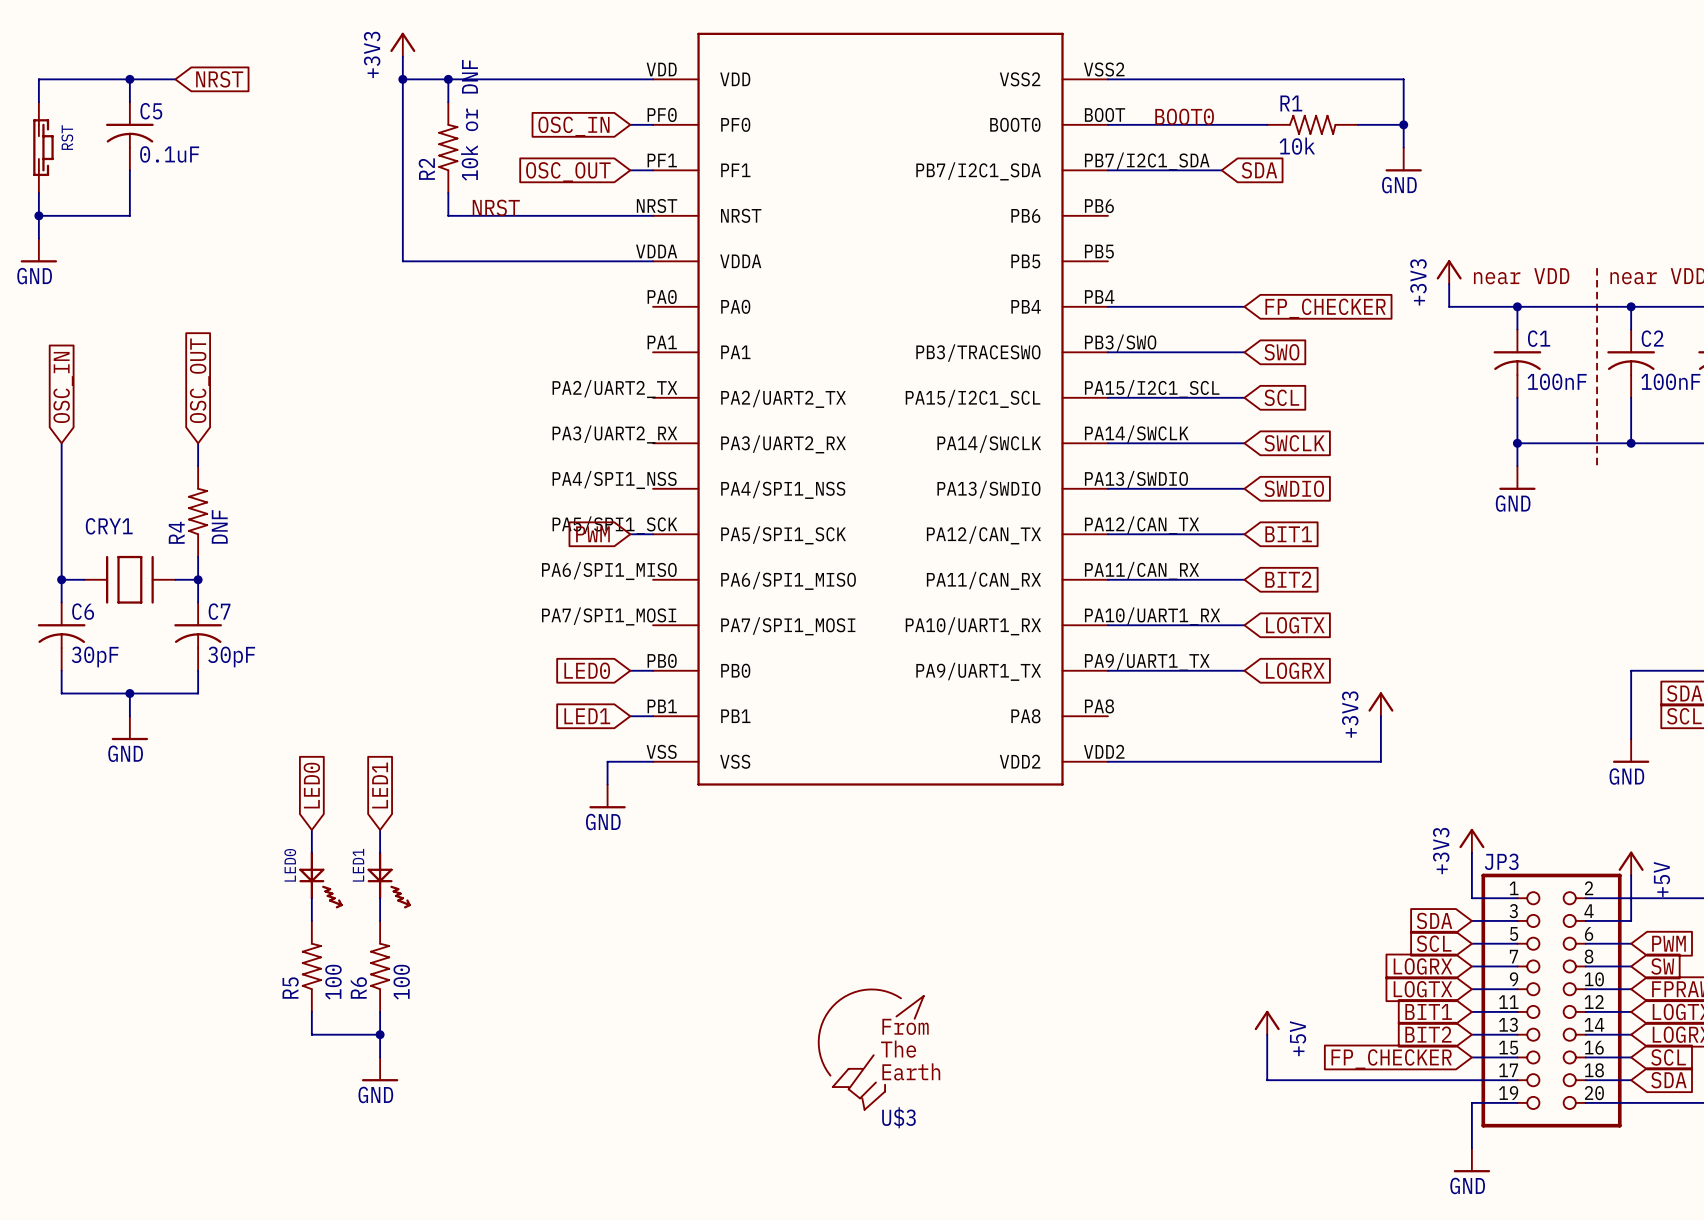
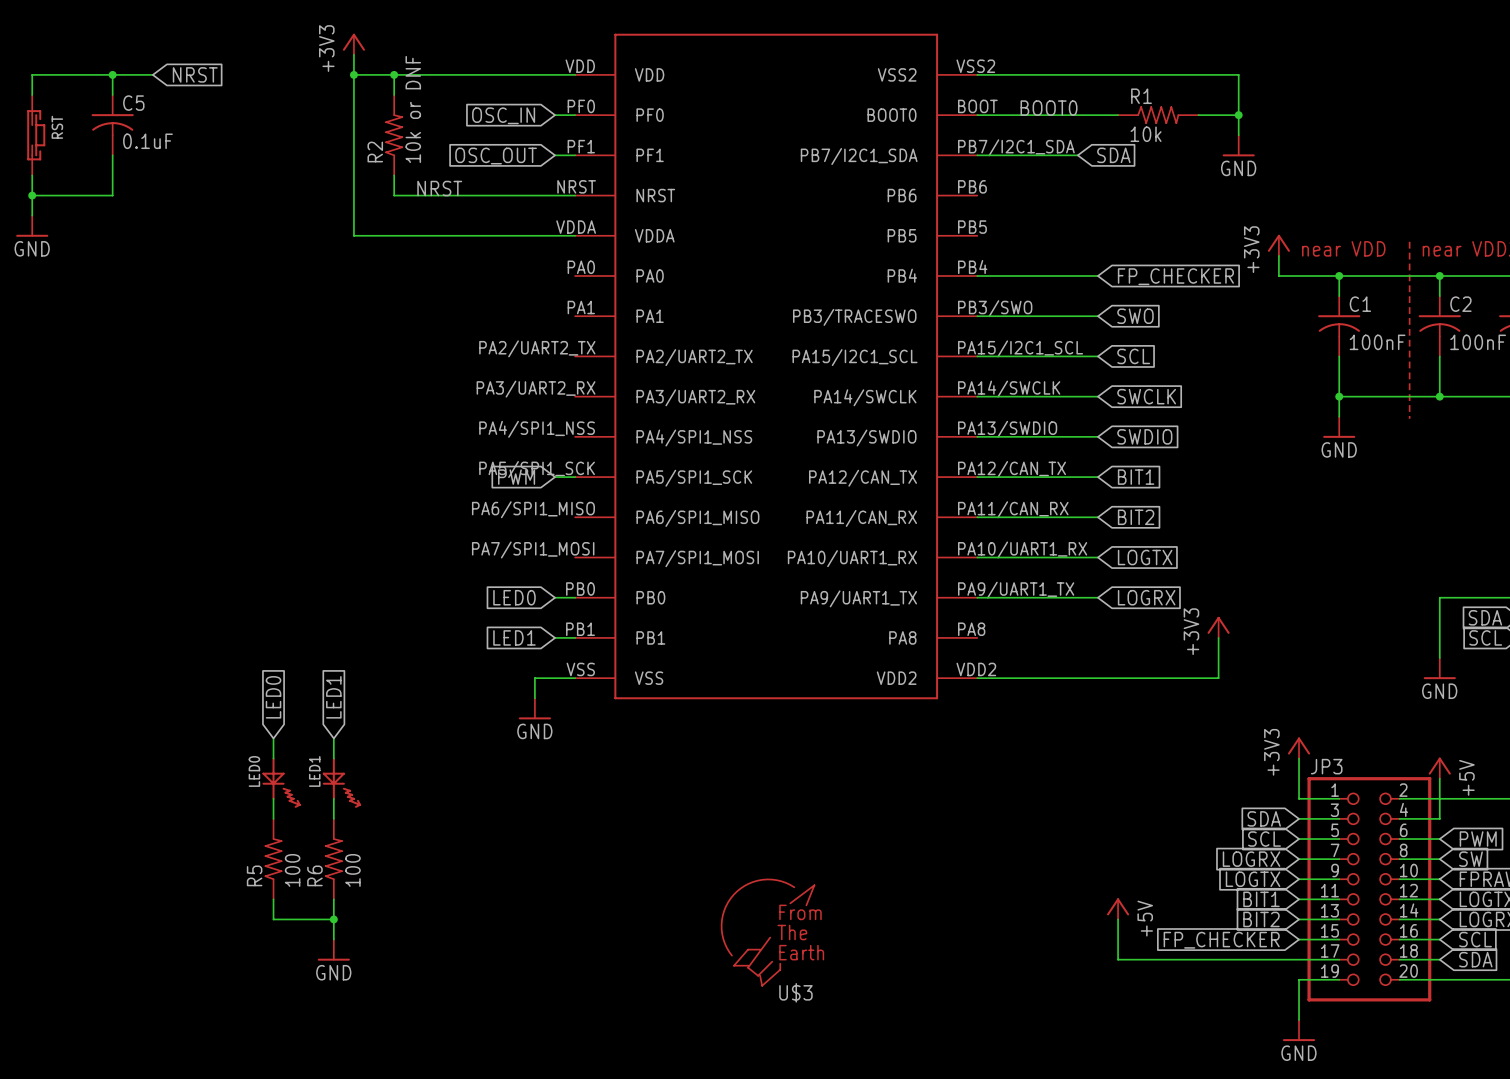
global label: OSC_OUT (199, 380) -> none
global label: OSC_IN (63, 387) -> none
wire: (61, 443) (61, 602) -> none
wire: (198, 443) (198, 466) -> none
R4: DNF (198, 511) -> none
wire: (198, 557) (198, 602) -> none
wire: (61, 579) (84, 579) -> none
junction: (61, 579) -> none
CRY1: (129, 579) -> none
wire: (175, 579) (198, 579) -> none
junction: (198, 579) -> none
C6: 30pF (61, 636) -> none
C7: 30pF (198, 636) -> none
wire: (61, 670) (61, 693) (198, 693) (198, 670) -> none
wire: (129, 693) (129, 716) -> none
junction: (129, 693) -> none
power symbol: GND (129, 728) -> none

